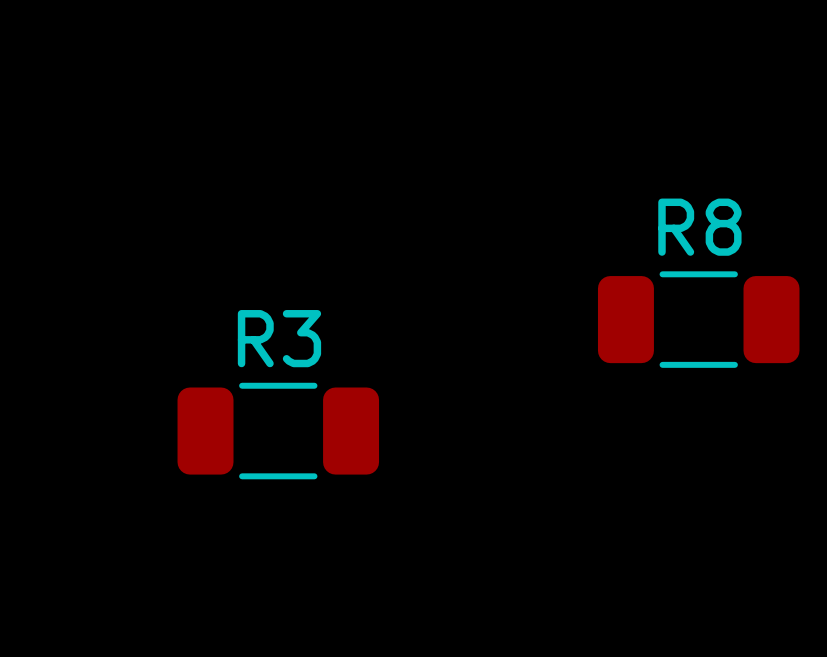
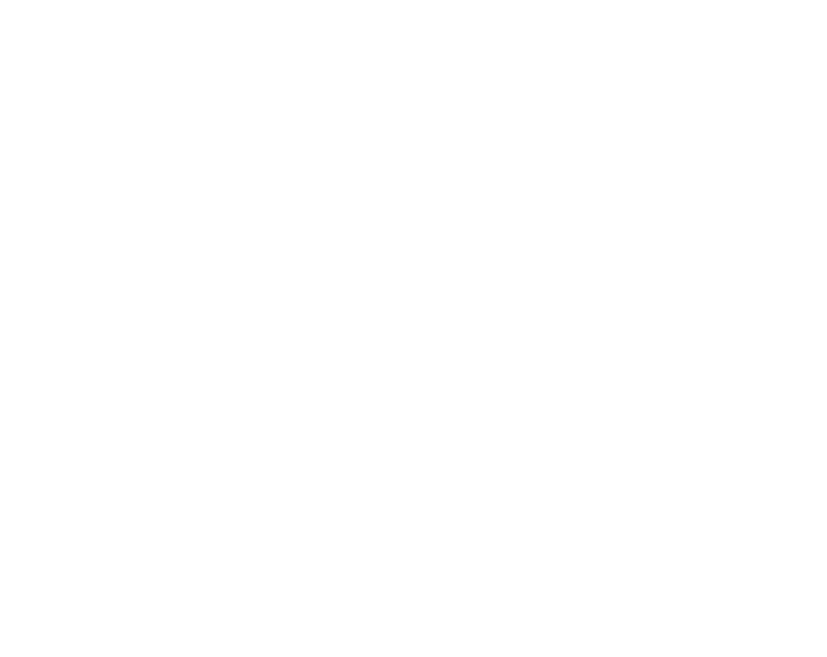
R8: (698, 319) -> none
R3: (278, 431) -> none

